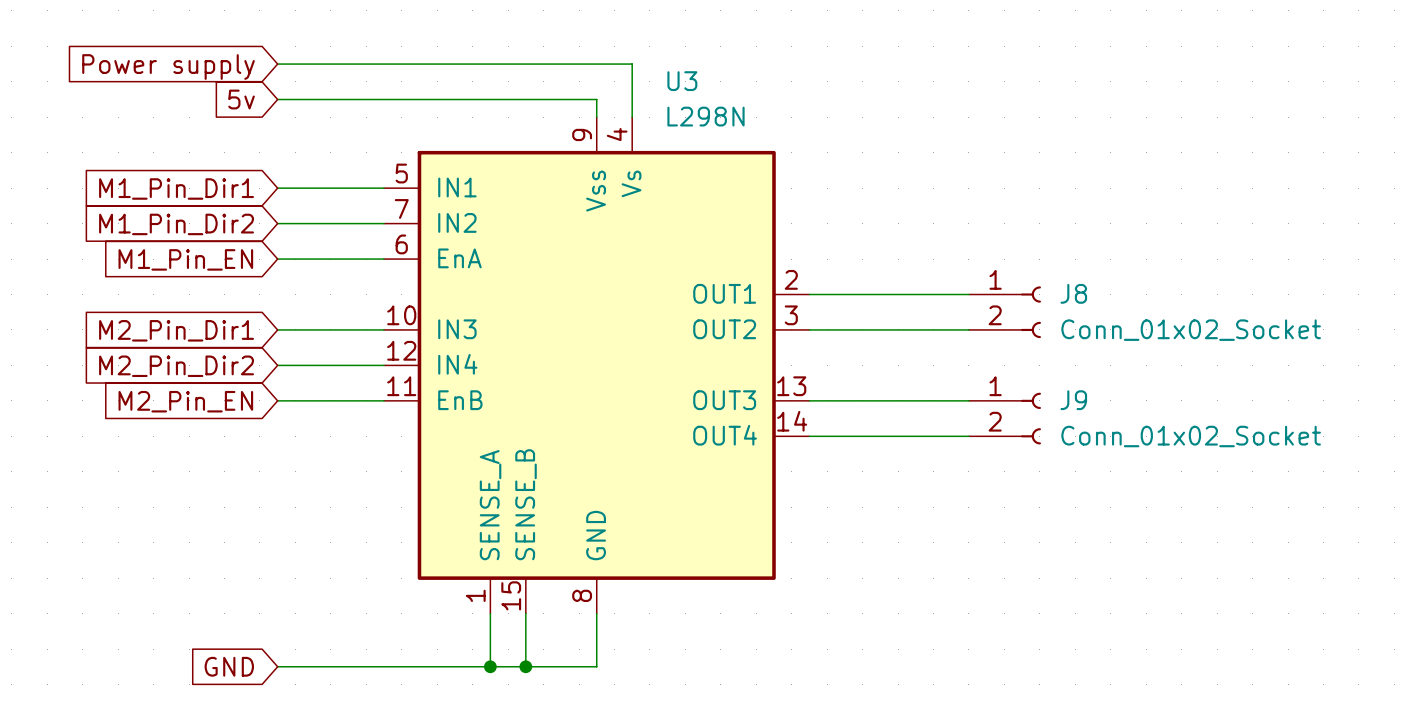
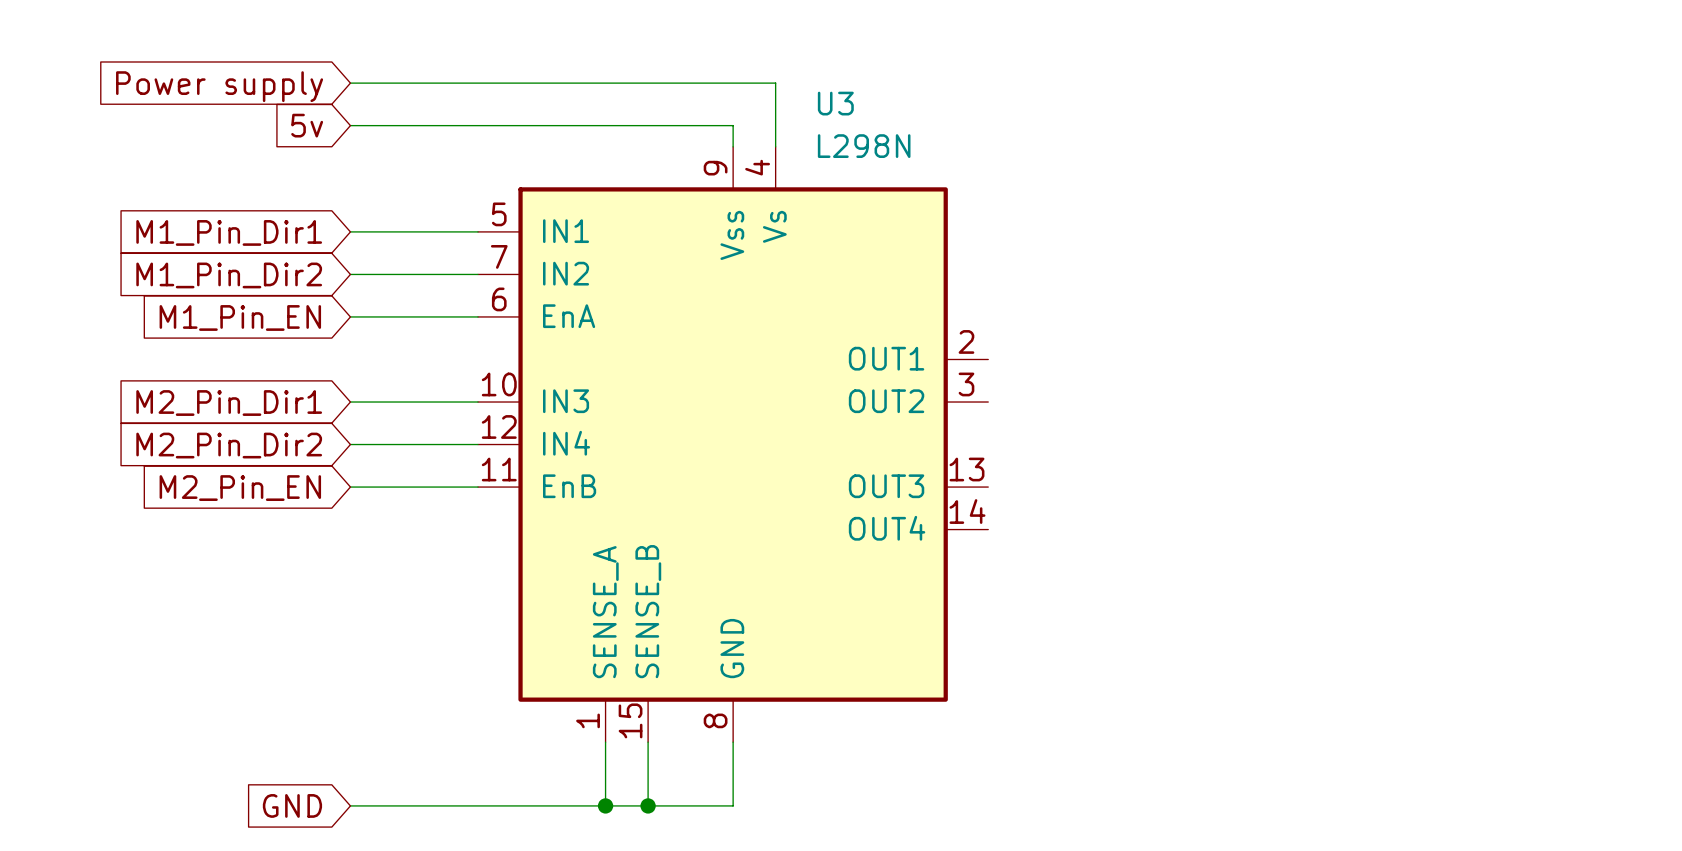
wire: (809, 294) (968, 294) -> none
J8: Conn_01x02_Socket (1004, 312) -> none
wire: (809, 329) (968, 329) -> none
wire: (809, 400) (968, 400) -> none
J9: Conn_01x02_Socket (1004, 418) -> none
wire: (809, 436) (968, 436) -> none

